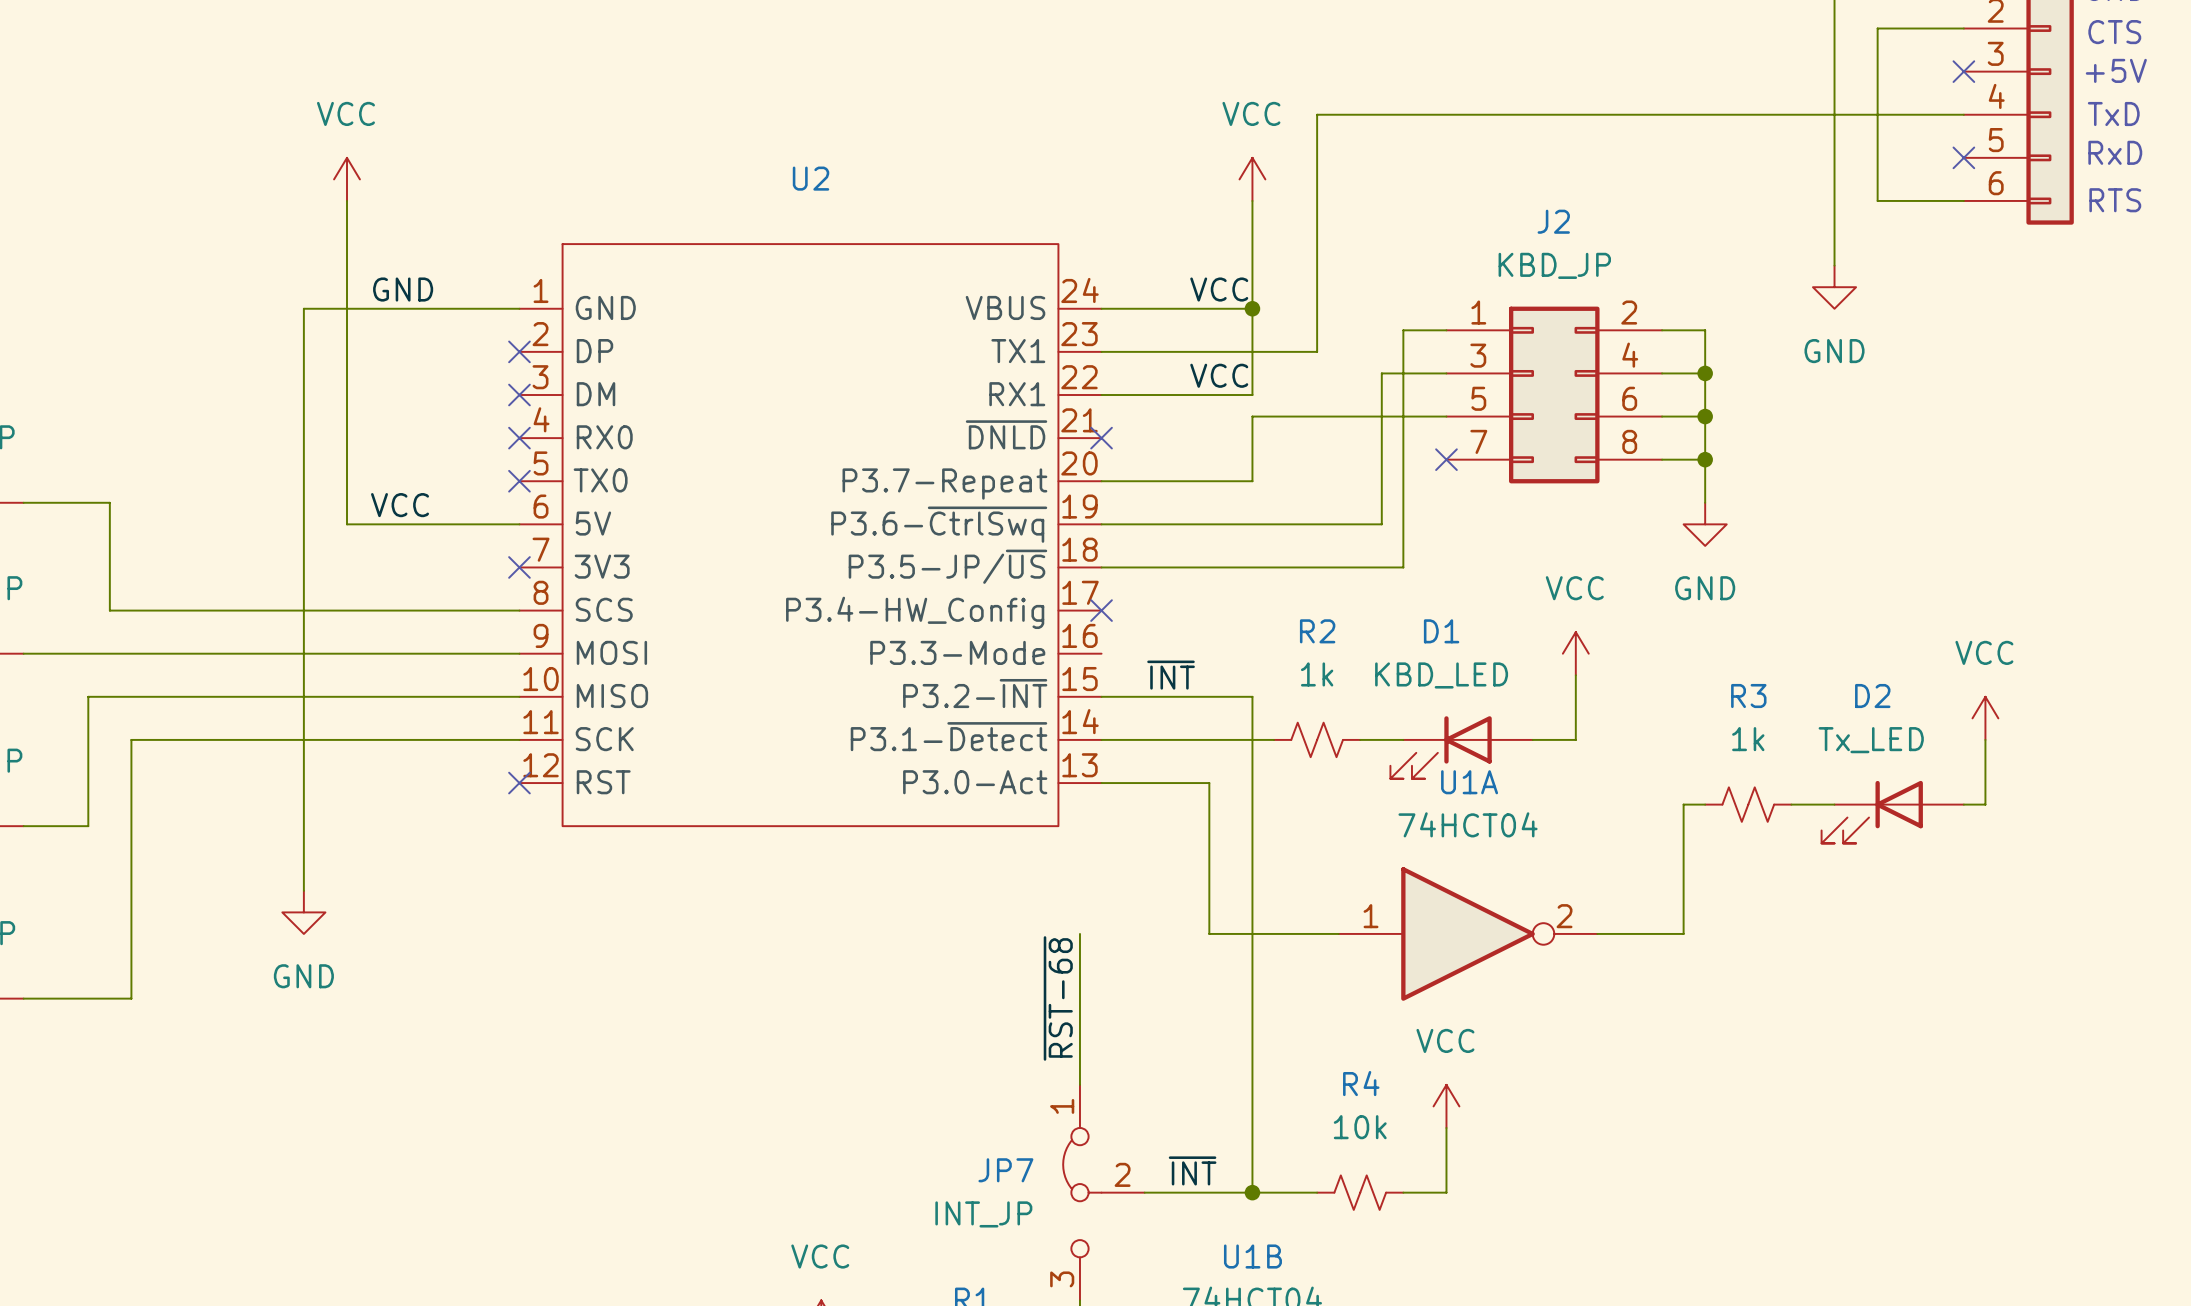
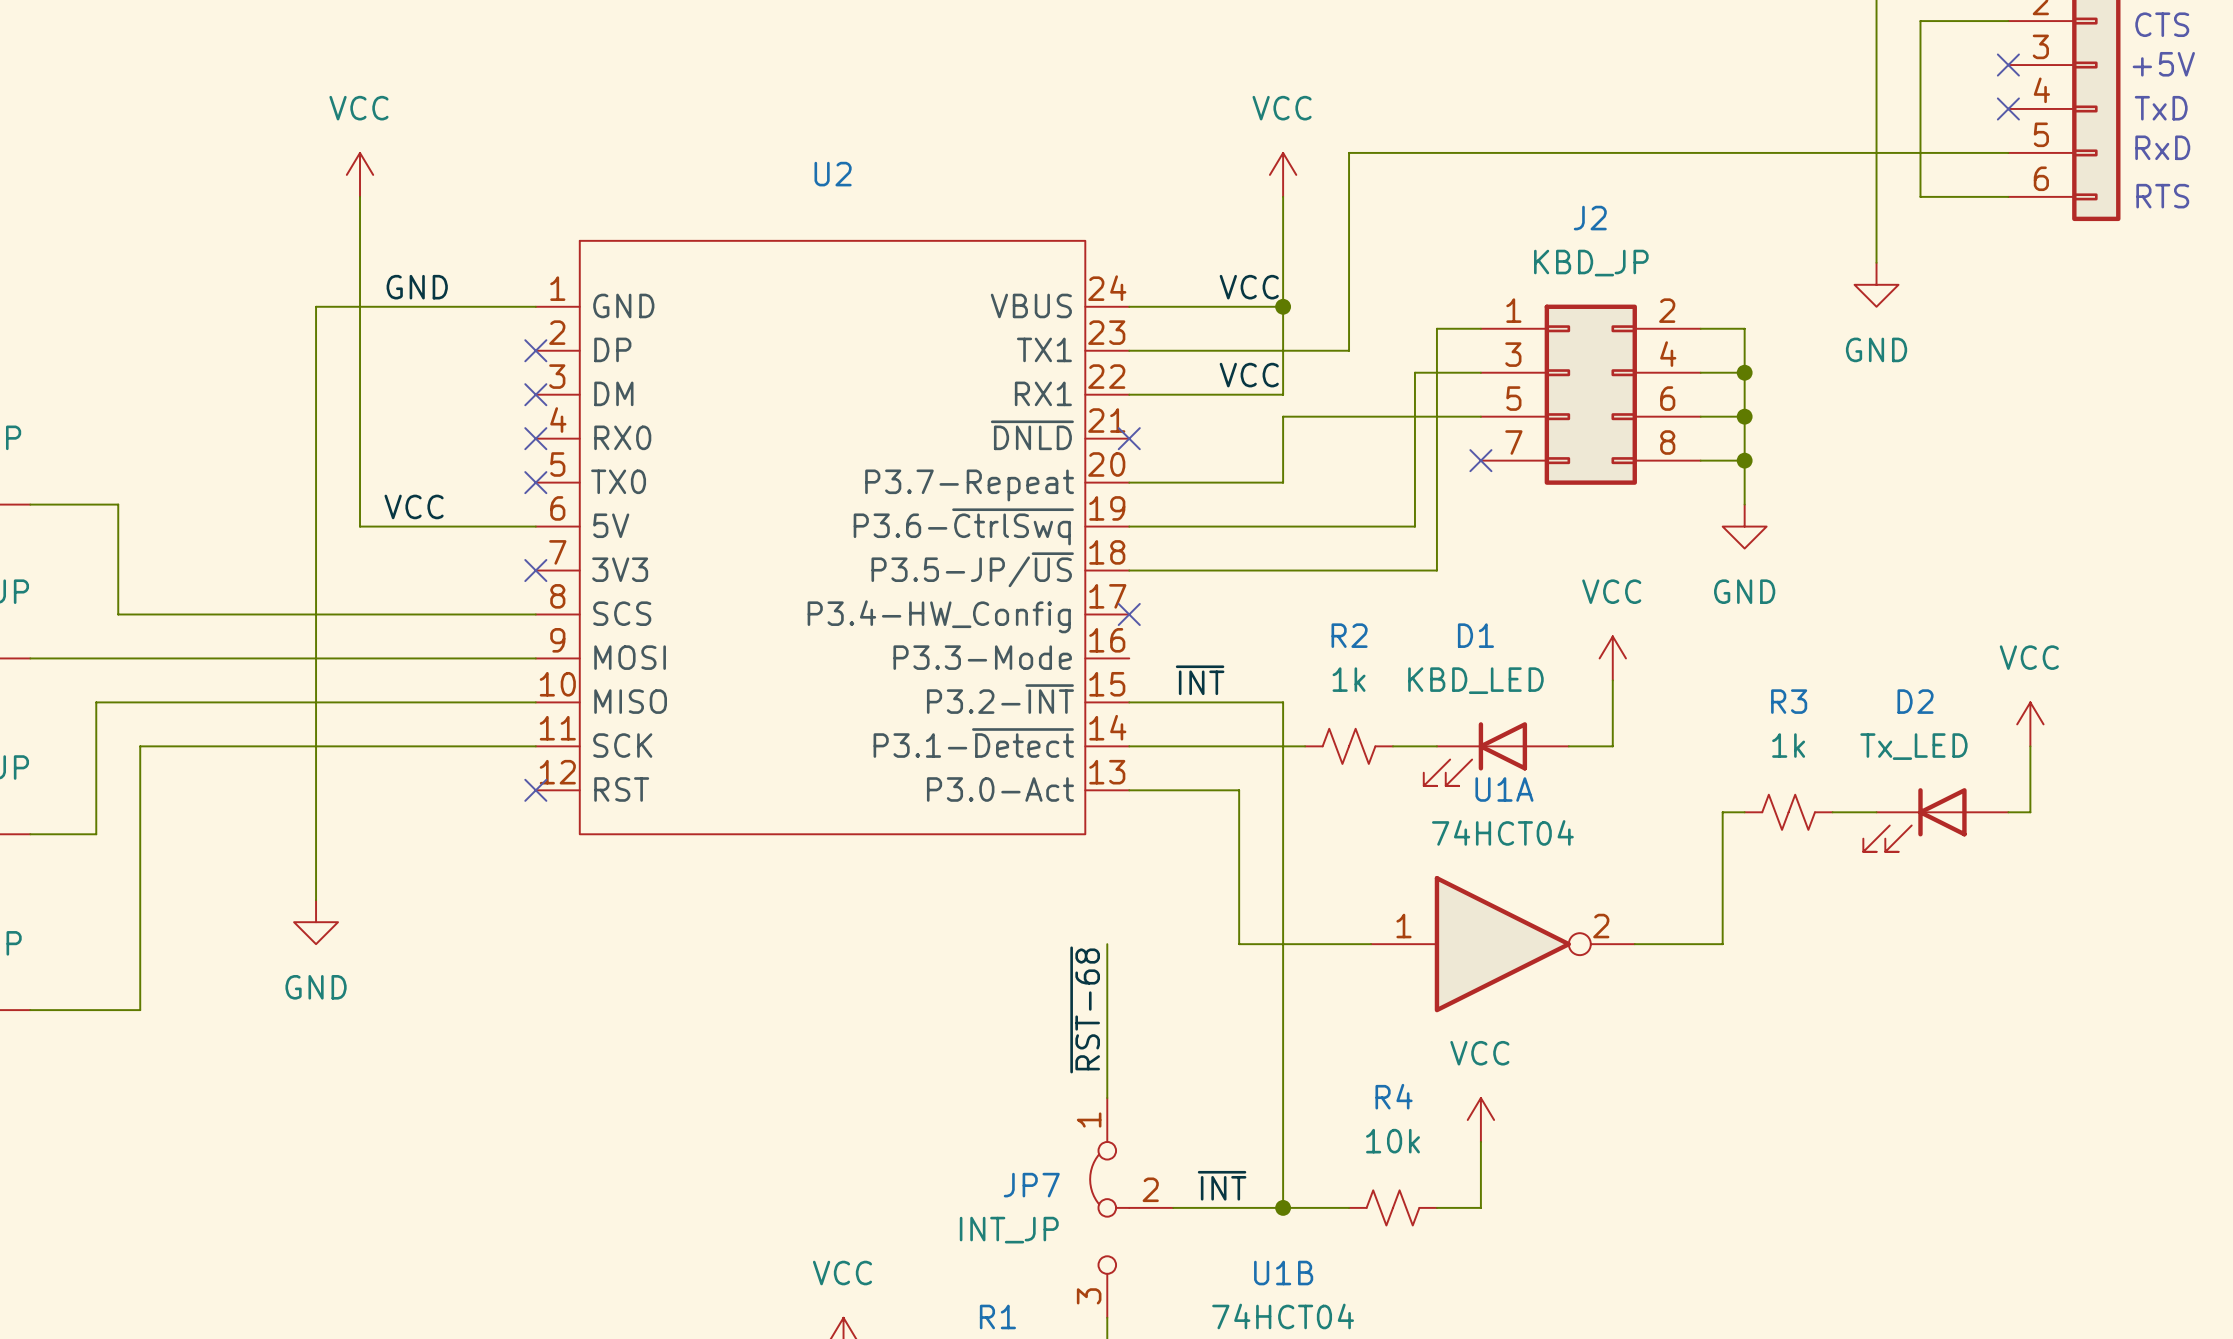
wire: (1963, 114) (1317, 114) (1317, 157) -> (2008, 152) (1349, 152)
no-connect mark position: (1963, 157) -> (2008, 108)

